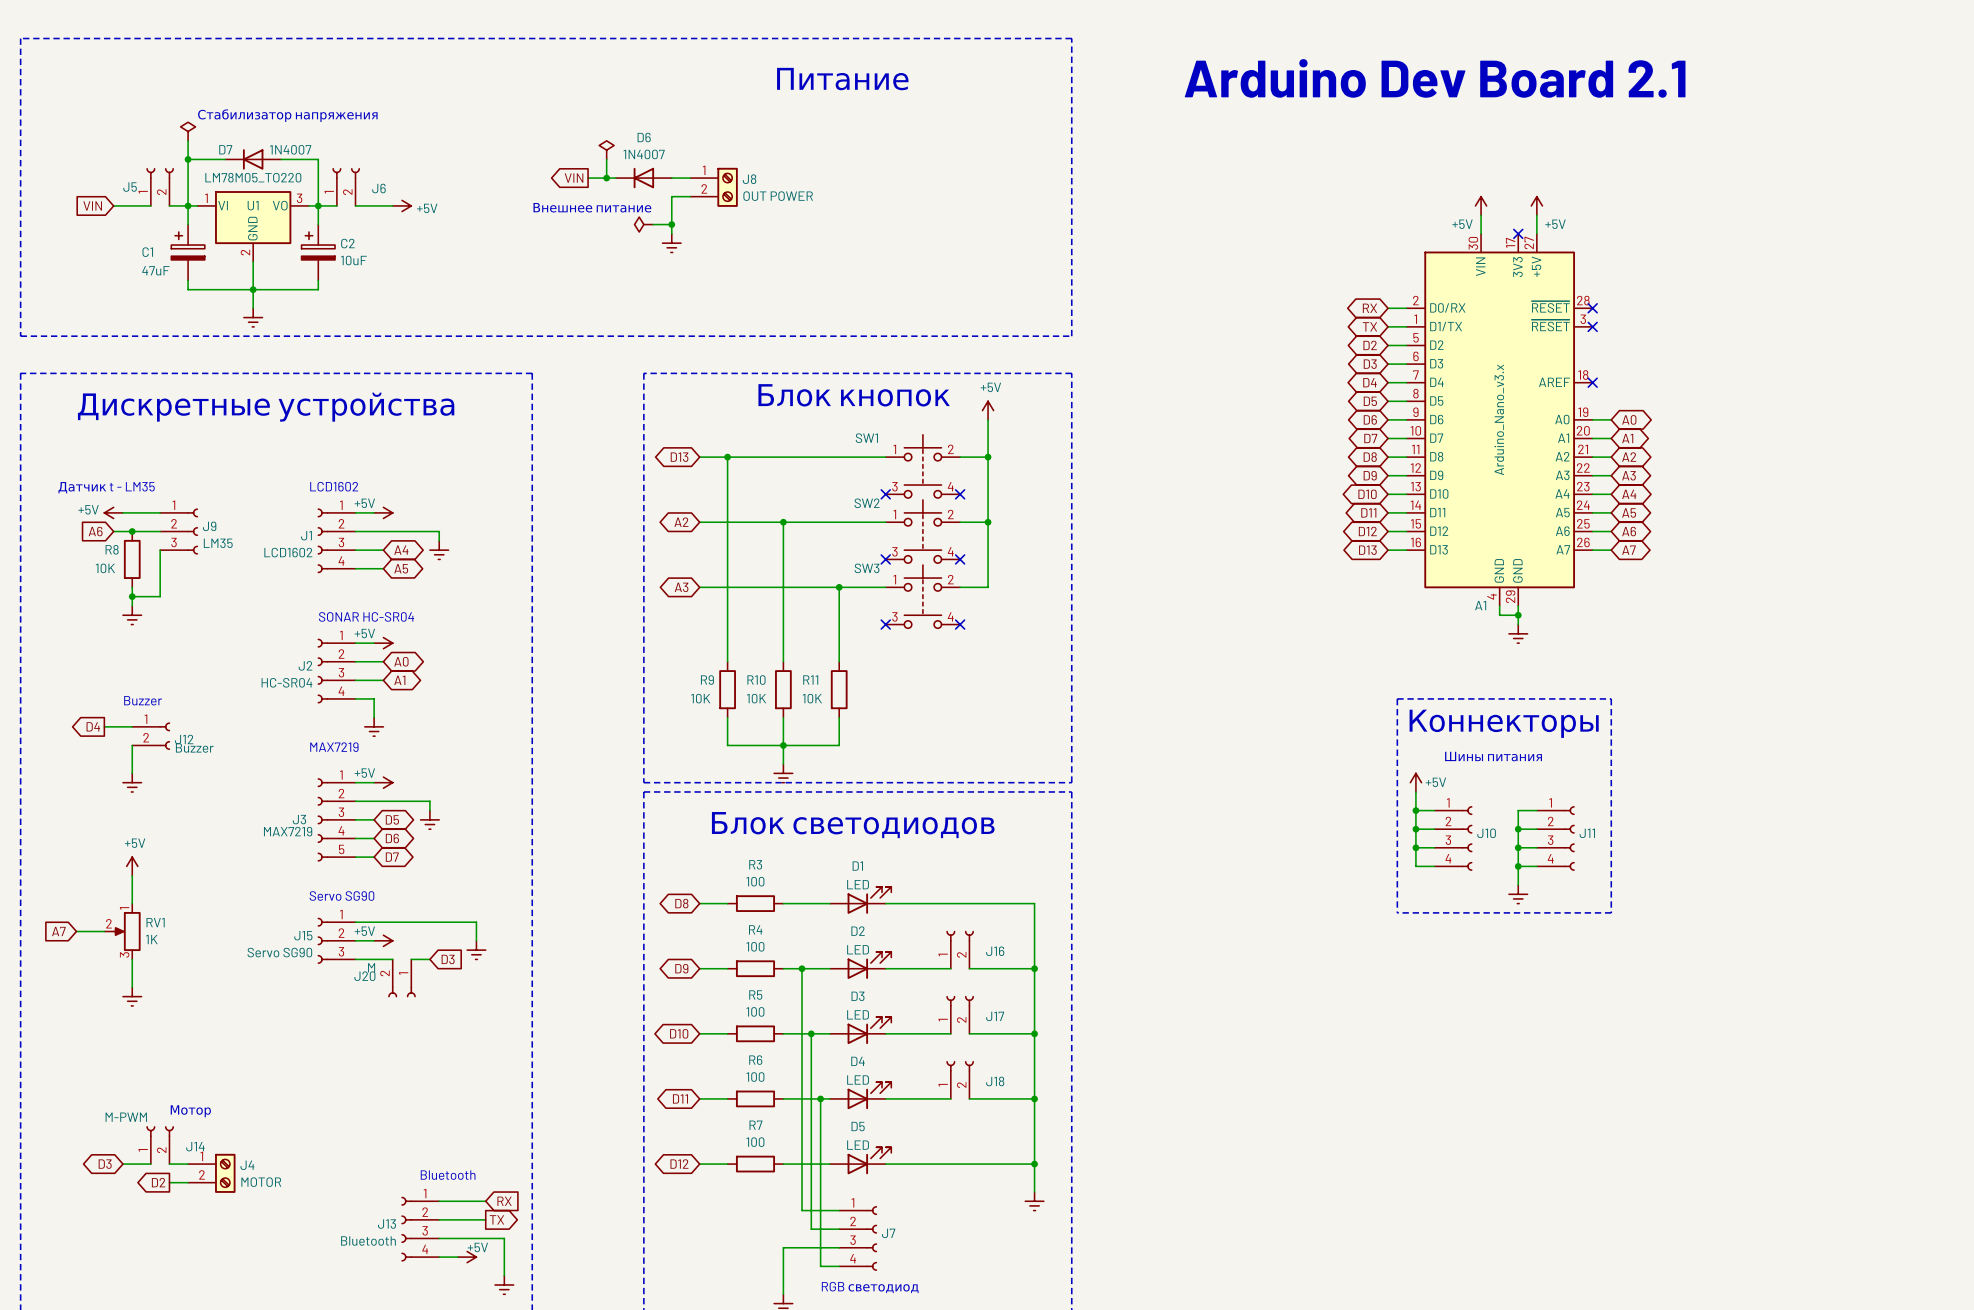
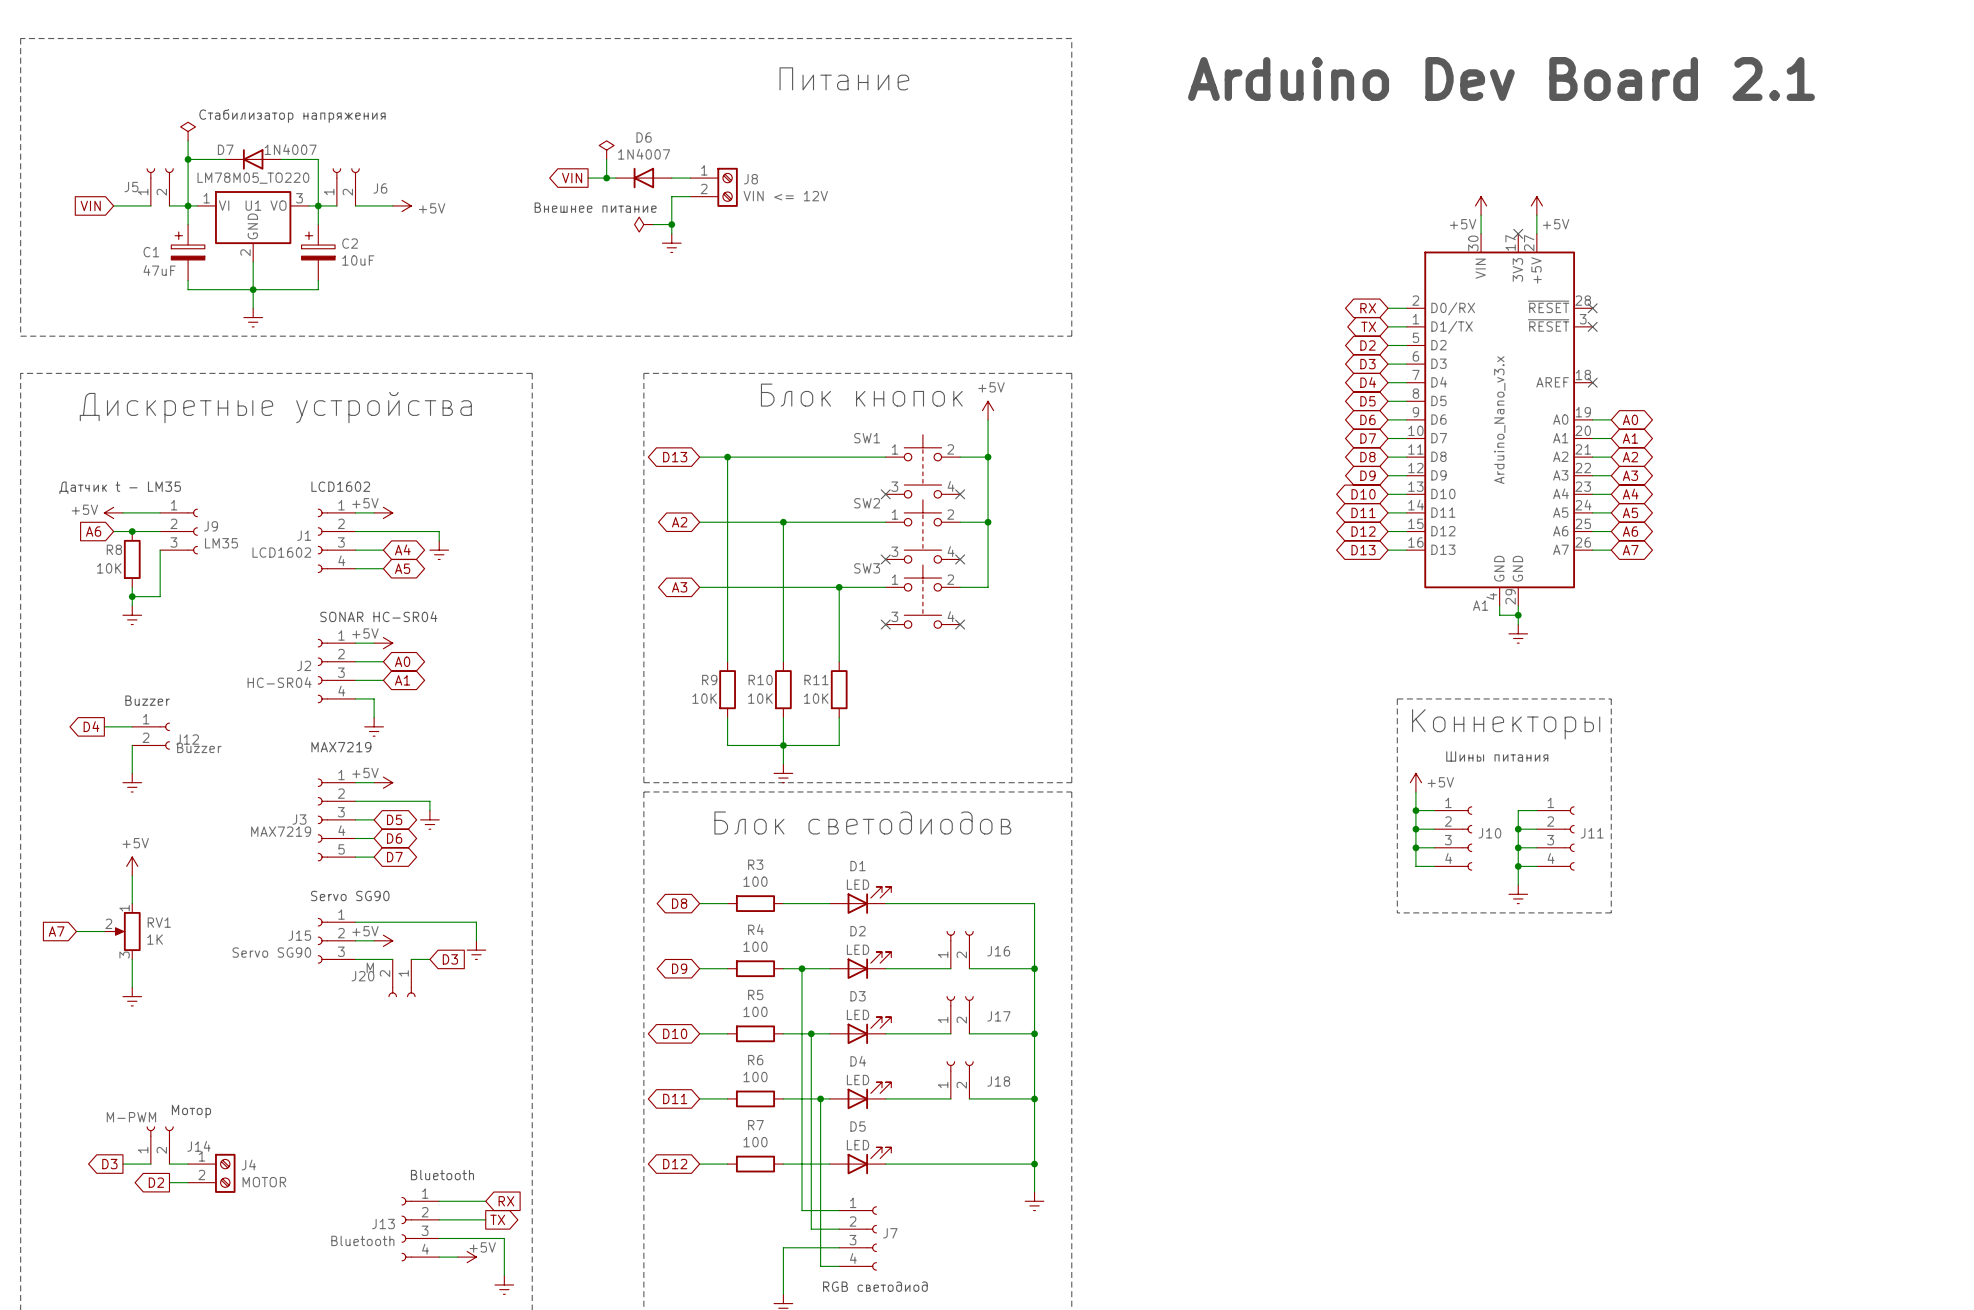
J8 value: OUT POWER (778, 196) -> VIN <= 12V (785, 196)
global label shape: bidirectional (105, 1164) -> output (109, 1164)

